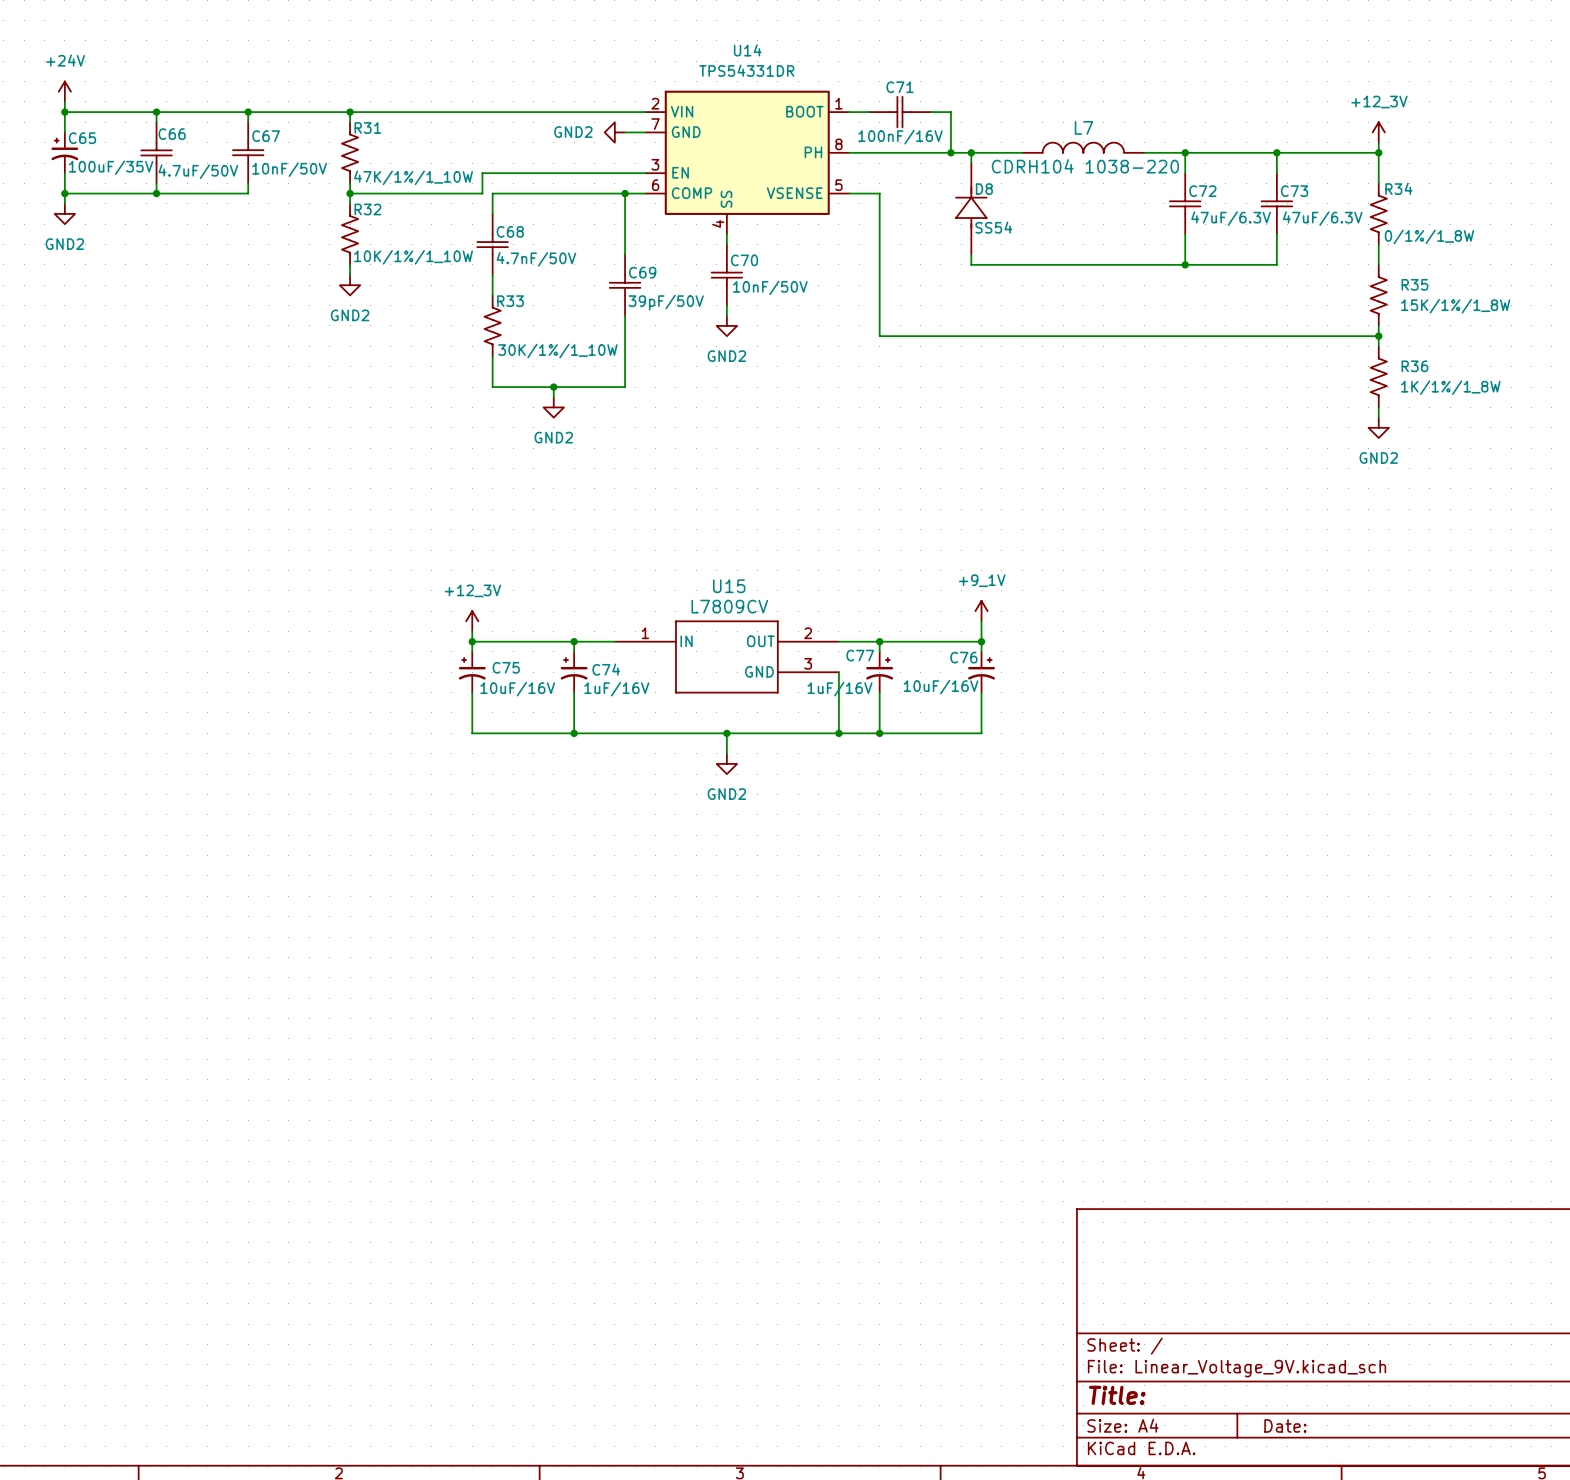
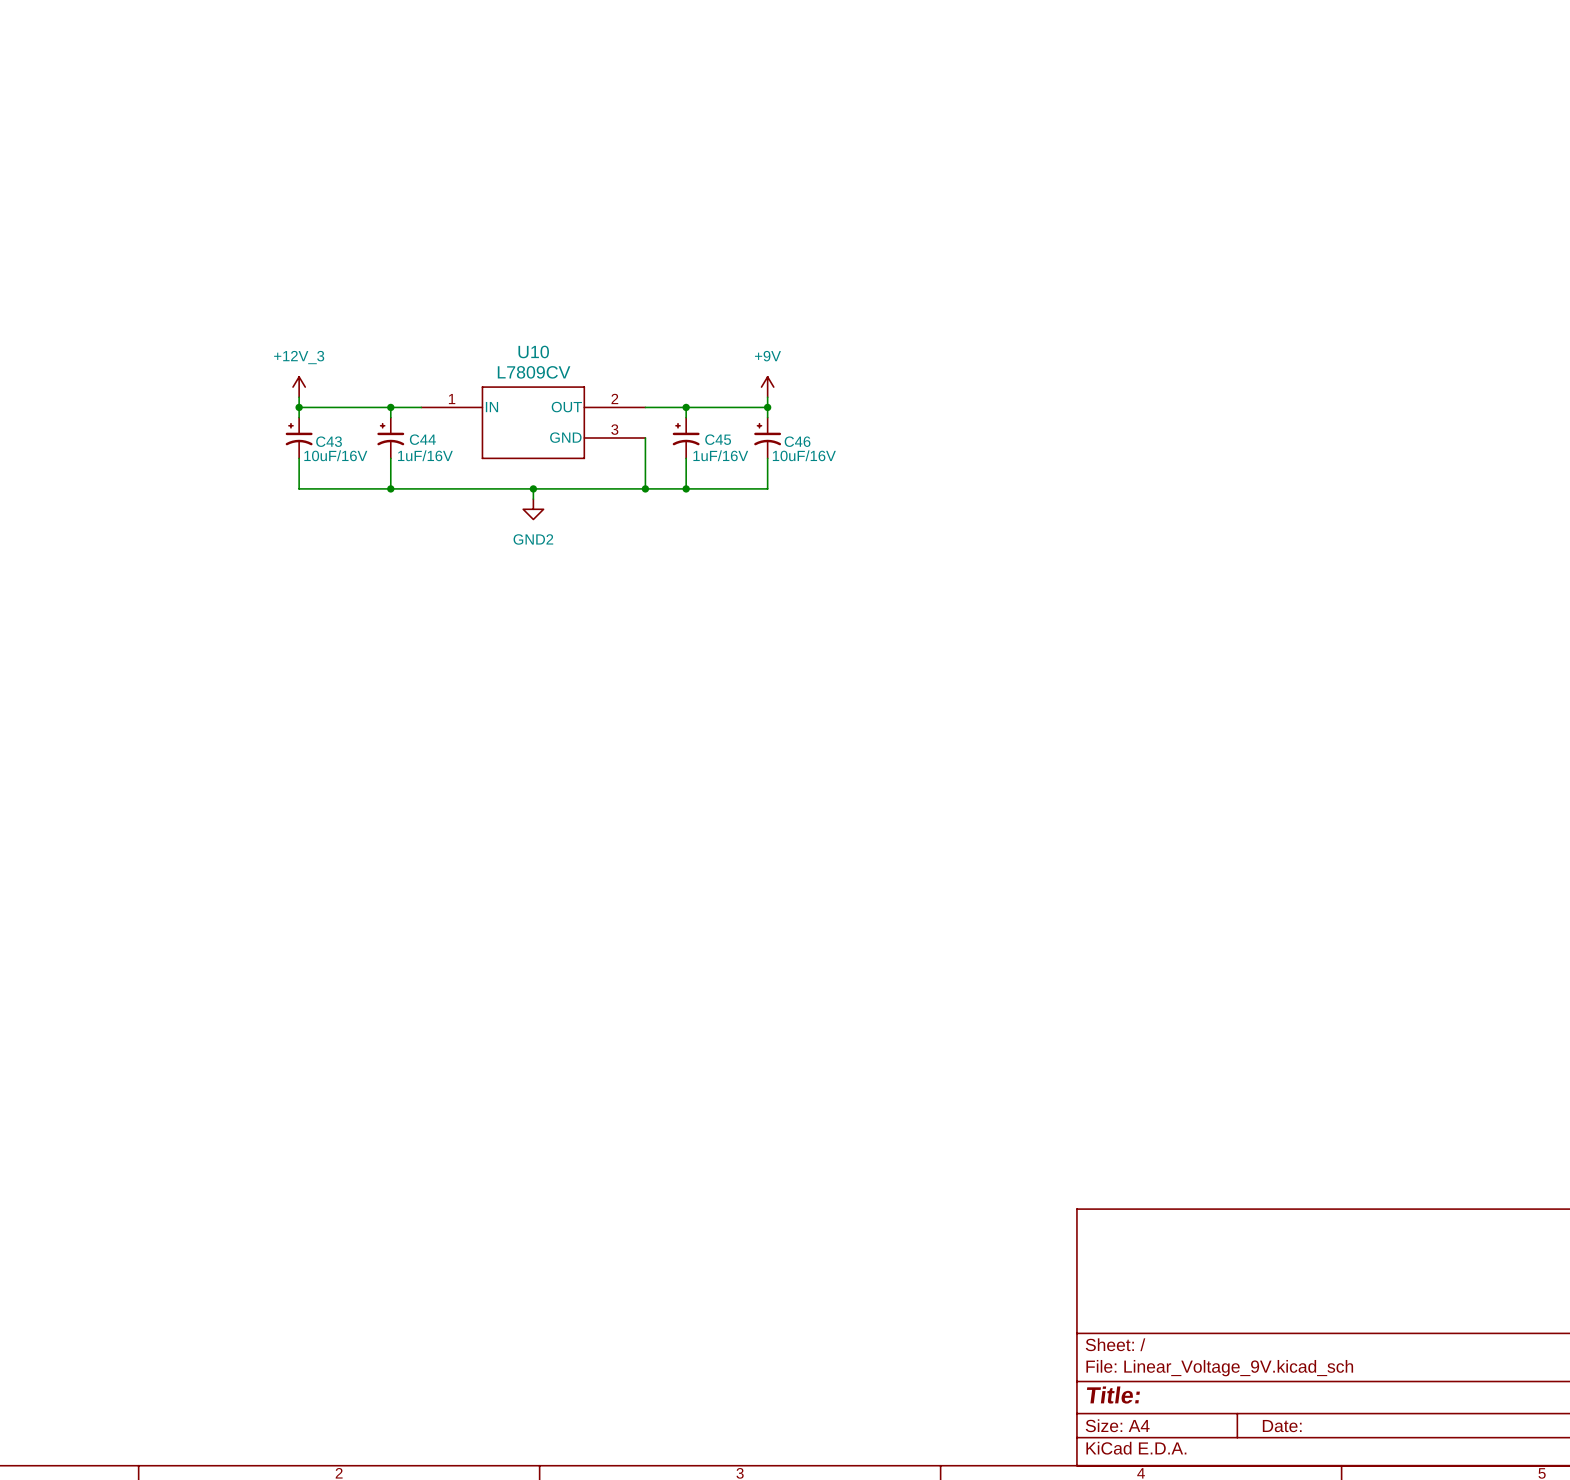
power symbol: +24V (64, 91) -> none
wire: (64, 101) (64, 132) -> none
wire: (64, 112) (645, 112) -> none
junction: (64, 112) -> none
wire: (156, 112) (156, 122) -> none
junction: (156, 112) -> none
wire: (248, 112) (248, 122) -> none
junction: (248, 112) -> none
wire: (350, 112) (350, 122) -> none
junction: (350, 112) -> none
wire: (849, 112) (869, 112) -> none
C71: 100nF/16V (900, 112) -> none
wire: (930, 112) (950, 112) (950, 152) -> none
power symbol: GND2 (614, 132) -> none
wire: (625, 132) (645, 132) -> none
power symbol: +12_3V (1378, 132) -> none
wire: (1378, 142) (1378, 183) -> none
L7: CDRH104 1038-220 (1083, 147) -> none
C65: 100uF/35V (64, 152) -> none
C66: 4.7uF/50V (156, 152) -> none
C67: 10nF/50V (248, 152) -> none
R31: 47K/1%/1_10W (350, 152) -> none
wire: (849, 152) (1022, 152) -> none
junction: (950, 152) -> none
wire: (971, 152) (971, 163) -> none
junction: (971, 152) -> none
wire: (1144, 152) (1378, 152) -> none
wire: (1185, 152) (1185, 173) -> none
junction: (1185, 152) -> none
wire: (1276, 152) (1276, 173) -> none
junction: (1276, 152) -> none
junction: (1378, 152) -> none
U14: TPS54331DR (747, 162) -> none
wire: (64, 173) (64, 203) -> none
wire: (645, 173) (482, 173) (482, 193) (350, 193) -> none
wire: (156, 183) (156, 193) -> none
wire: (248, 183) (248, 193) (64, 193) -> none
wire: (350, 183) (350, 203) -> none
junction: (64, 193) -> none
junction: (156, 193) -> none
junction: (350, 193) -> none
wire: (625, 193) (625, 254) -> none
junction: (625, 193) -> none
wire: (645, 193) (492, 193) (492, 213) -> none
wire: (849, 193) (879, 193) (879, 336) (1378, 336) -> none
C72: 47uF/6.3V (1185, 203) -> none
C73: 47uF/6.3V (1276, 203) -> none
D8: SS54 (971, 208) -> none
power symbol: GND2 (64, 213) -> none
R34: 0/1%/1_8W (1378, 213) -> none
R32: 10K/1%/1_10W (350, 234) -> none
wire: (726, 234) (726, 244) -> none
wire: (1185, 234) (1185, 264) -> none
wire: (1276, 234) (1276, 264) (971, 264) (971, 254) -> none
C68: 4.7nF/50V (492, 244) -> none
wire: (1378, 244) (1378, 264) -> none
wire: (350, 264) (350, 275) -> (390, 407) (390, 417)
junction: (1185, 264) -> none
wire: (492, 275) (492, 295) -> none
C70: 10nF/50V (726, 275) -> none
power symbol: GND2 (350, 285) -> none
C69: 39pF/50V (625, 285) -> none
R35: 15K/1%/1_8W (1378, 295) -> none
wire: (726, 305) (726, 315) -> (686, 407) (686, 417)
wire: (625, 315) (625, 387) (492, 387) (492, 356) -> none
R33: 30K/1%/1_10W (492, 325) -> none
power symbol: GND2 (726, 325) -> none
wire: (1378, 325) (1378, 346) -> none
junction: (1378, 336) -> none
R36: 1K/1%/1_8W (1378, 376) -> none
power symbol: none -> +12V_3 (299, 387)
wire: (553, 387) (553, 397) -> (533, 488) (533, 499)
junction: (553, 387) -> none
power symbol: none -> +9V (767, 387)
wire: none -> (299, 397) (299, 417)
wire: none -> (767, 397) (767, 417)
wire: none -> (299, 407) (421, 407)
junction: none -> (299, 407)
junction: none -> (390, 407)
power symbol position: GND2 (553, 407) -> GND2 (533, 509)
wire: none -> (645, 407) (767, 407)
junction: none -> (686, 407)
junction: none -> (767, 407)
wire: (1378, 407) (1378, 417) -> none
U10: none -> L7809CV (533, 422)
power symbol: GND2 (1378, 427) -> none
C43: none -> 10uF/16V (299, 438)
C44: none -> 1uF/16V (390, 438)
wire: none -> (645, 438) (645, 488)
C45: none -> 1uF/16V (686, 438)
C46: none -> 10uF/16V (767, 438)
wire: none -> (299, 458) (299, 488) (767, 488) (767, 458)
wire: none -> (390, 458) (390, 488)
wire: none -> (686, 458) (686, 488)
junction: none -> (390, 488)
junction: none -> (533, 488)
junction: none -> (645, 488)
junction: none -> (686, 488)
power symbol: +9_1V (981, 611) -> none
power symbol: +12_3V (472, 621) -> none
wire: (981, 621) (981, 651) -> none
wire: (472, 631) (472, 651) -> none
wire: (472, 641) (614, 641) -> none
junction: (472, 641) -> none
wire: (574, 641) (574, 651) -> none
junction: (574, 641) -> none
wire: (838, 641) (981, 641) -> none
wire: (879, 641) (879, 651) -> none
junction: (879, 641) -> none
junction: (981, 641) -> none
U15: L7809CV (726, 656) -> none
C75: 10uF/16V (472, 672) -> none
C74: 1uF/16V (574, 672) -> none
wire: (838, 672) (838, 733) -> none
C77: 1uF/16V (879, 672) -> none
C76: 10uF/16V (981, 672) -> none
wire: (472, 692) (472, 733) (981, 733) (981, 692) -> none
wire: (574, 692) (574, 733) -> none
wire: (879, 692) (879, 733) -> none
junction: (574, 733) -> none
wire: (726, 733) (726, 753) -> none
junction: (726, 733) -> none
junction: (838, 733) -> none
junction: (879, 733) -> none
power symbol: GND2 (726, 763) -> none

